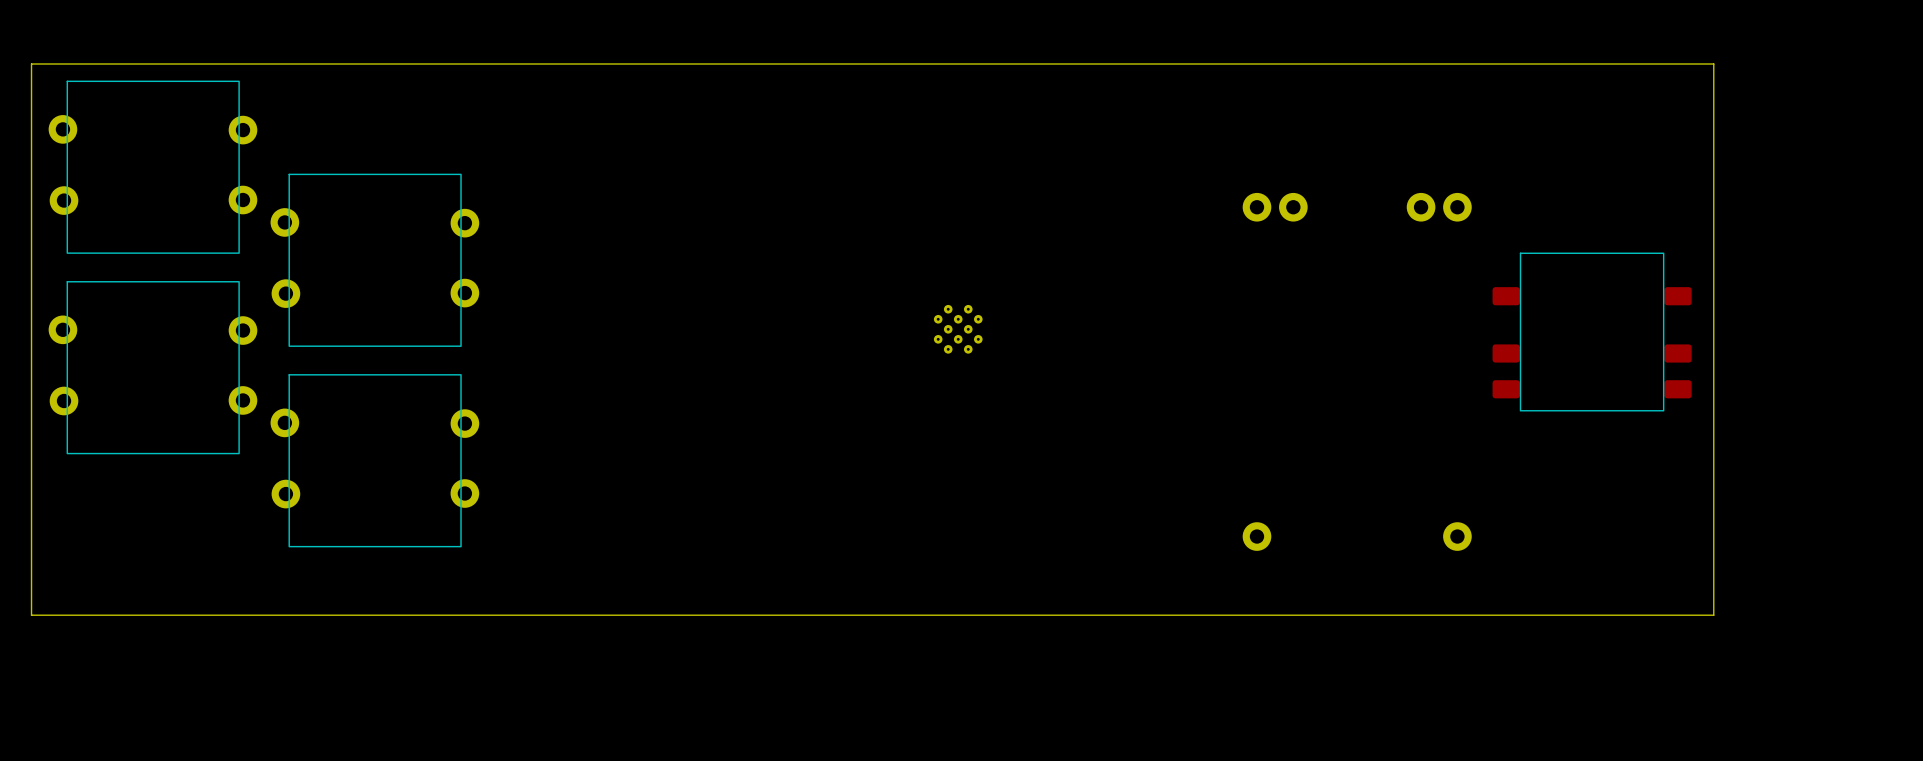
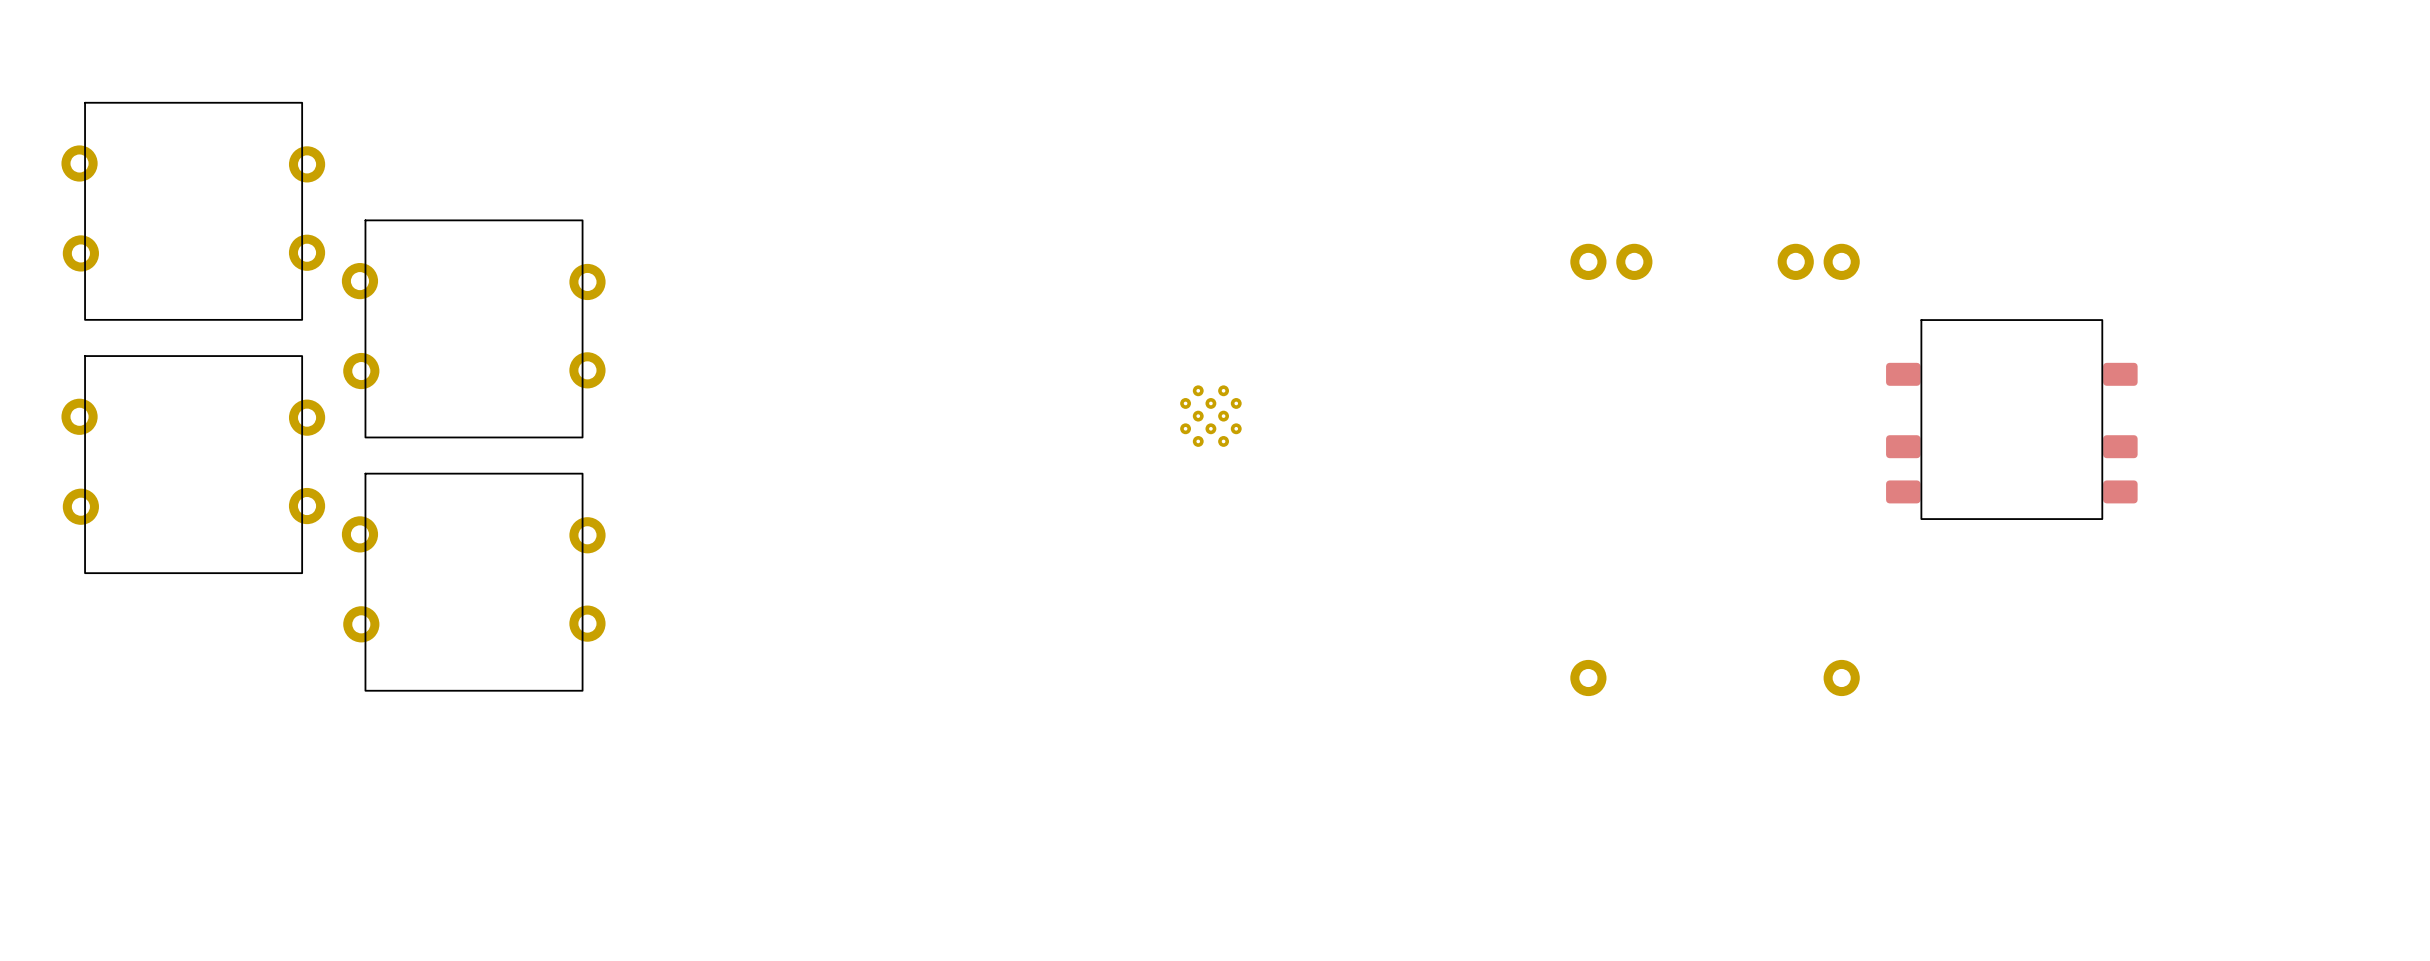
board edge: (31, 64) (1713, 64) (1713, 615) (31, 615) (31, 64) -> none

